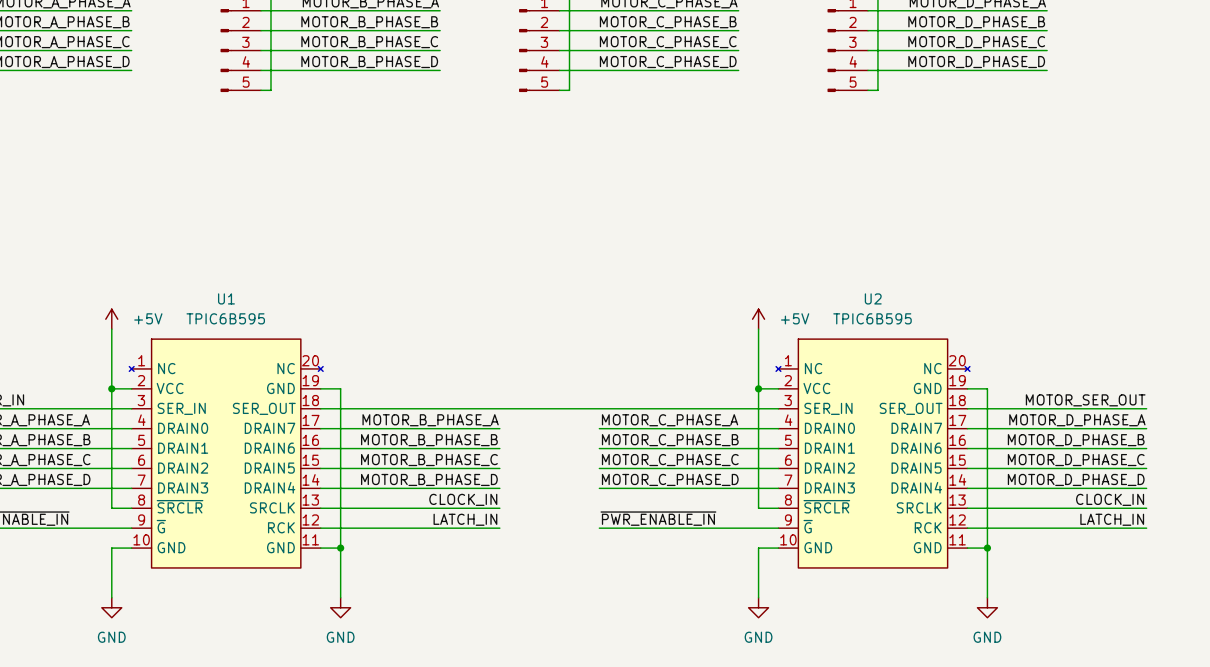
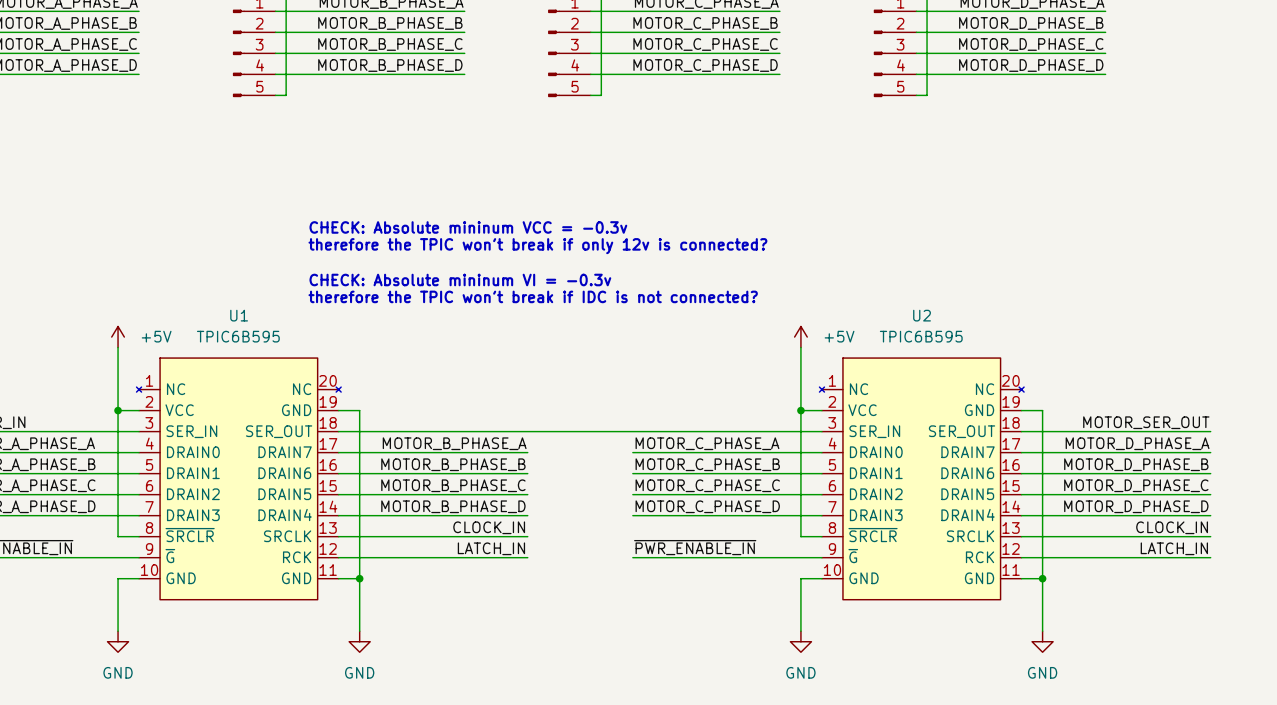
text: none -> CHECK: Absolute mininum VCC = -0.3v (468, 227)
text: none -> therefore the TPIC won't break if only 12v is connected? (537, 246)
text: none -> CHECK: Absolute mininum VI = -0.3v (460, 280)
text: none -> therefore the TPIC won't break if IDC is not connected? (533, 296)

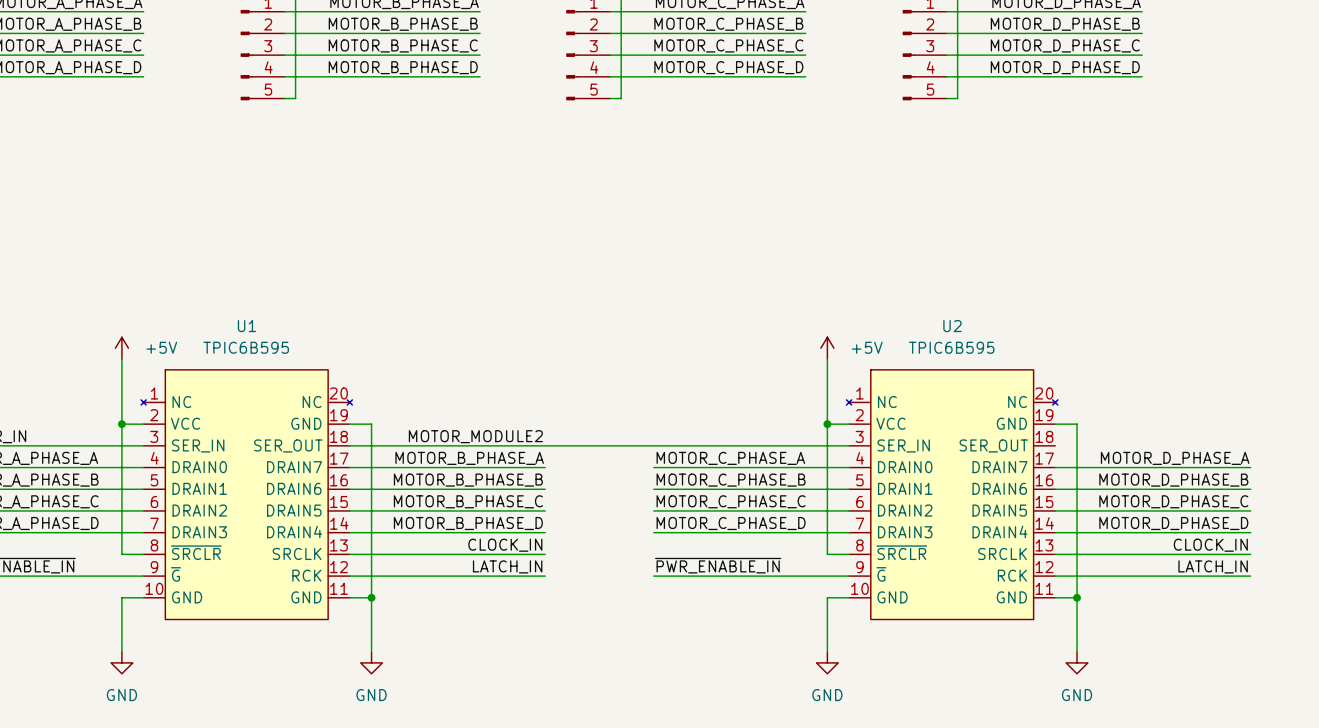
text: CHECK: Absolute mininum VCC = -0.3v (468, 227) -> none
text: therefore the TPIC won't break if only 12v is connected? (537, 246) -> none
text: CHECK: Absolute mininum VI = -0.3v (460, 280) -> none
text: therefore the TPIC won't break if IDC is not connected? (533, 296) -> none
label: none -> MOTOR_MODULE2 (475, 436)
label: MOTOR_SER_OUT (1146, 422) -> none
wire: (1021, 431) (1210, 431) -> none

